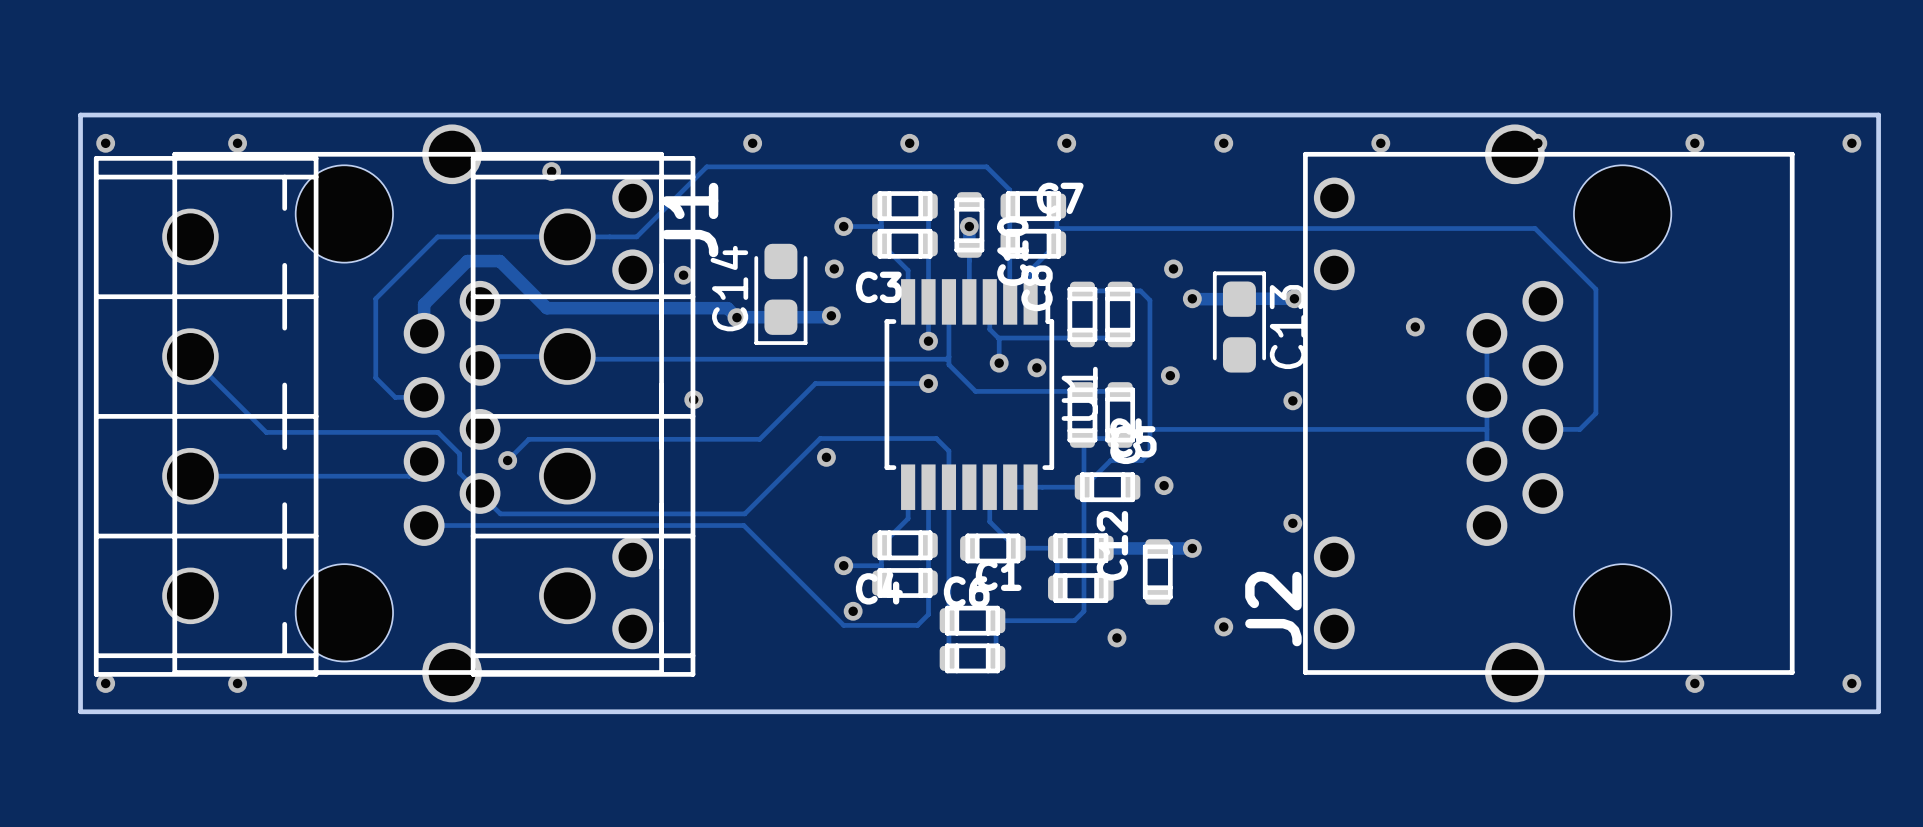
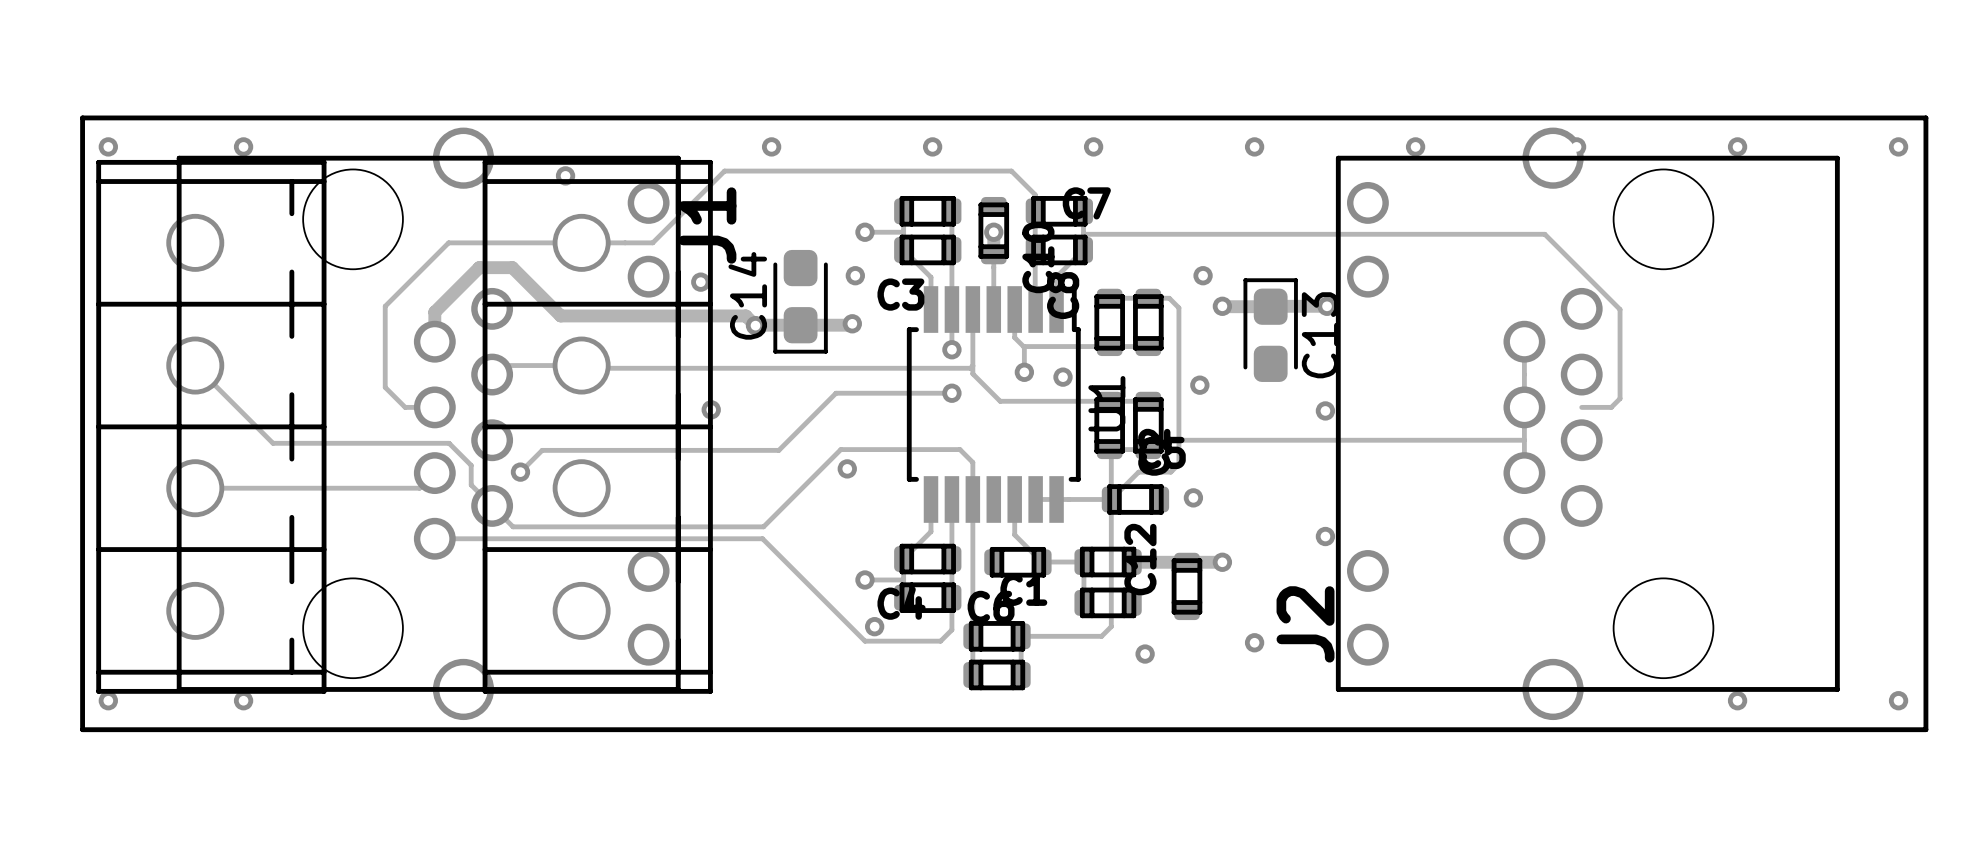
track: (1506, 228) (1535, 228) (1595, 289) (1595, 413) (1579, 429) (1542, 429) -> (1544, 234) (1620, 309) (1620, 398) (1611, 407) (1581, 407)
via: (1415, 327) -> none

